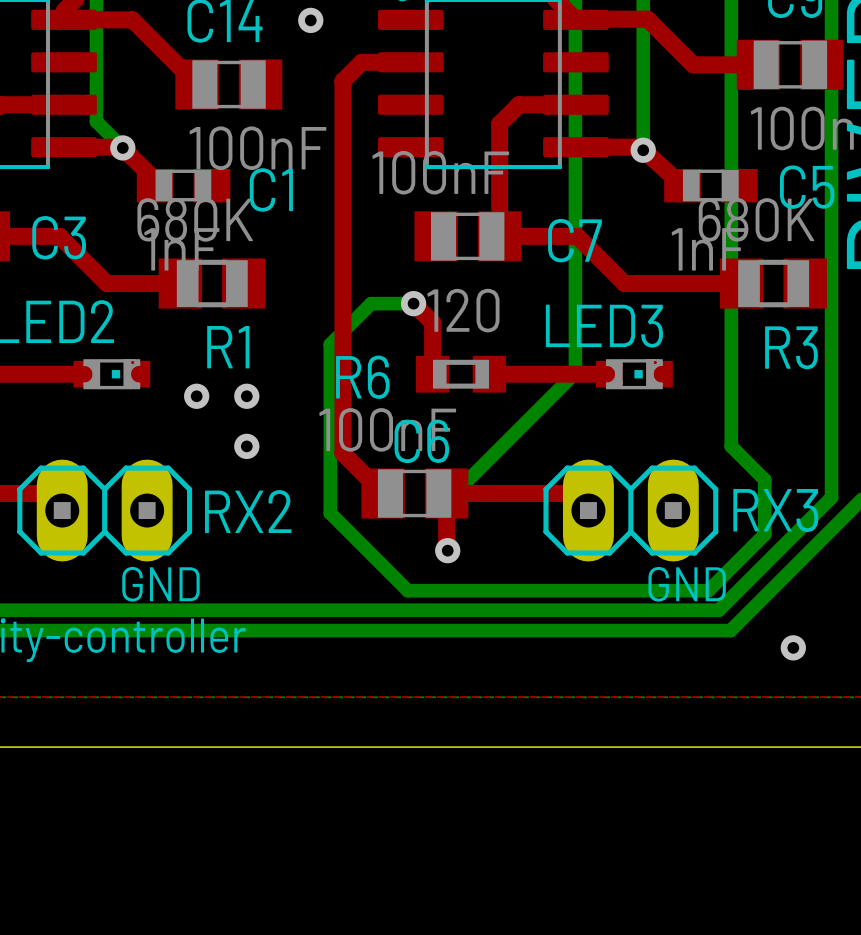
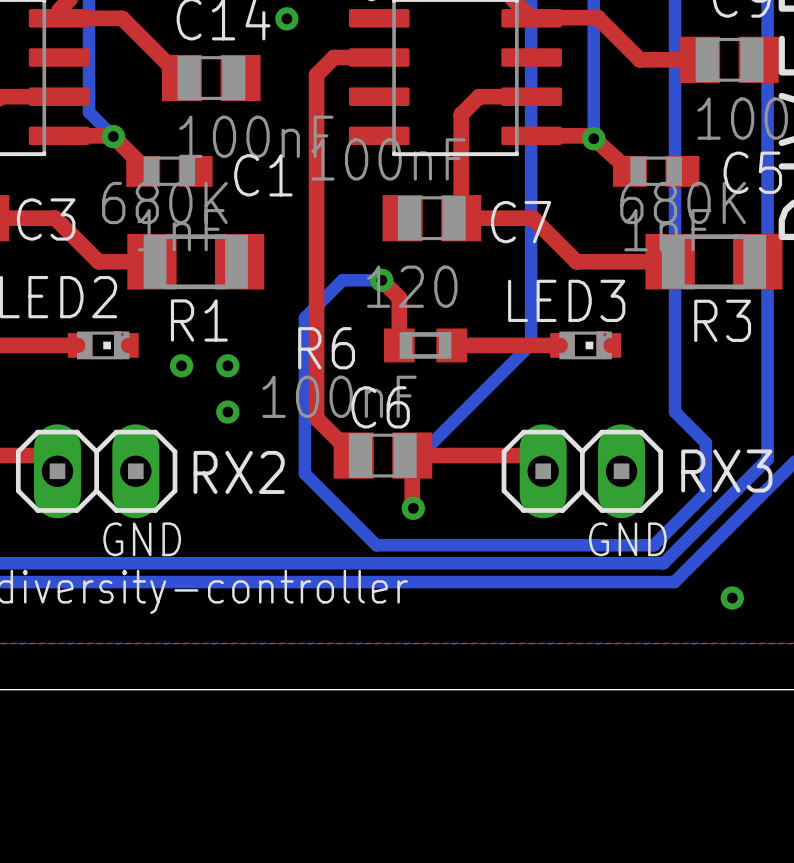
R1 footprint: [158, 258, 266, 309] -> [127, 233, 265, 290]
R3 footprint: [720, 258, 827, 309] -> [645, 233, 783, 290]

